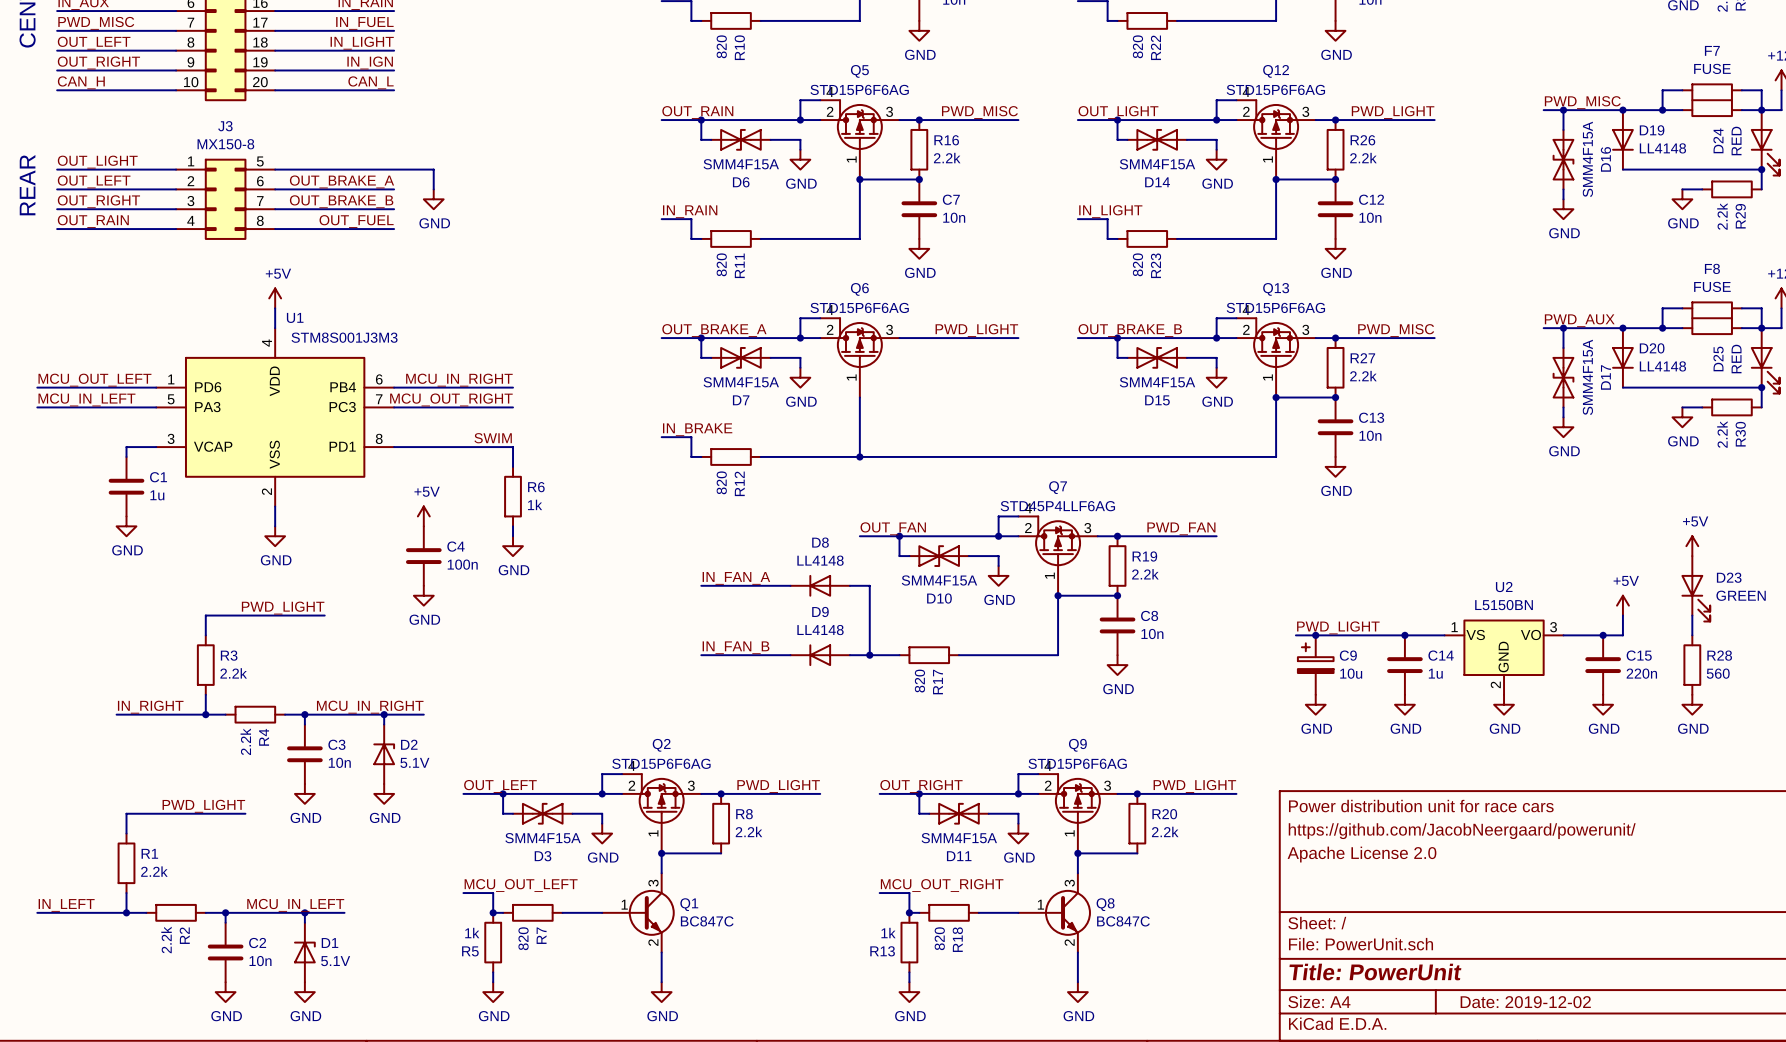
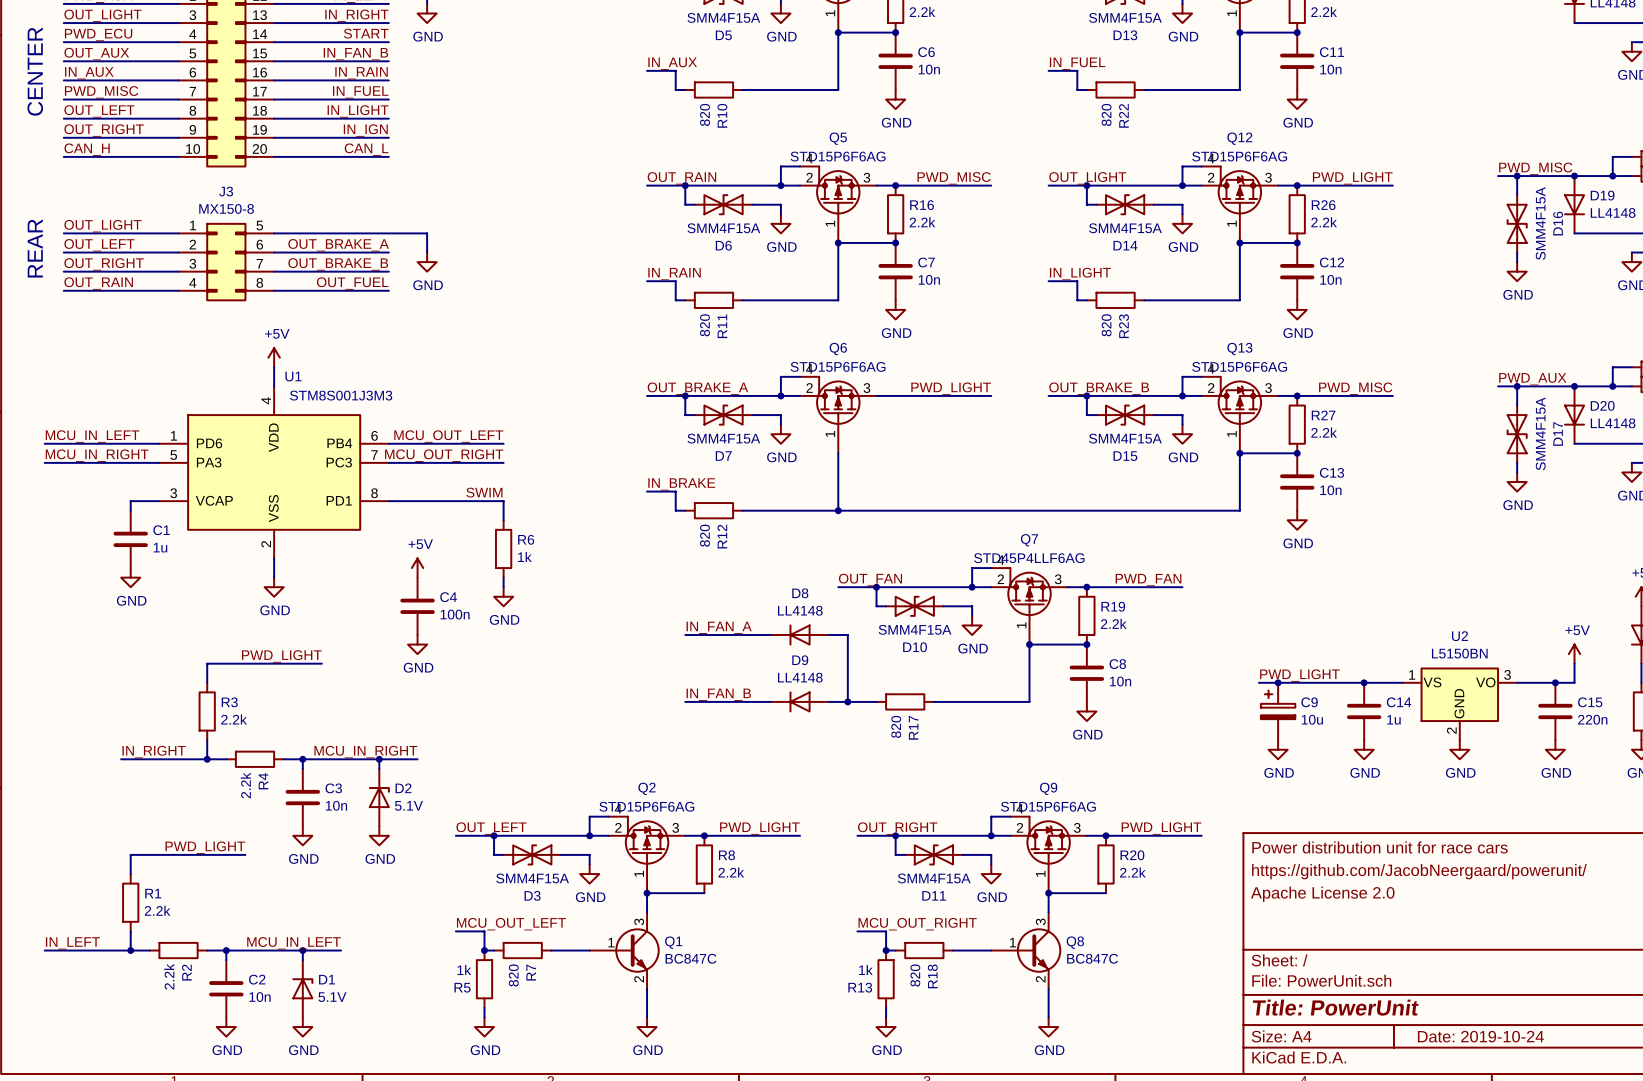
label: MCU_OUT_LEFT (94, 380) -> MCU_IN_LEFT (92, 436)
label: MCU_IN_RIGHT (459, 380) -> MCU_OUT_LEFT (448, 436)
label: MCU_IN_LEFT (86, 399) -> MCU_IN_RIGHT (97, 455)
title block: Date: 2019-12-02 (1525, 1002) -> Date: 2019-10-24 (1480, 1036)

